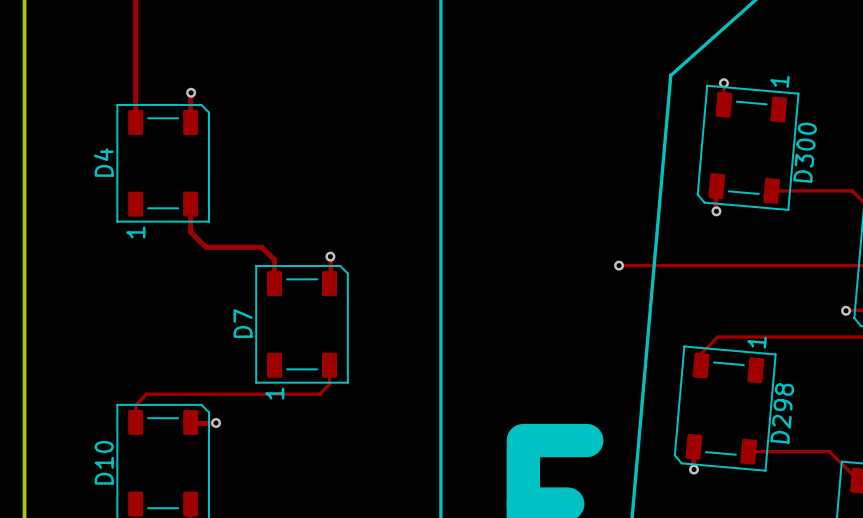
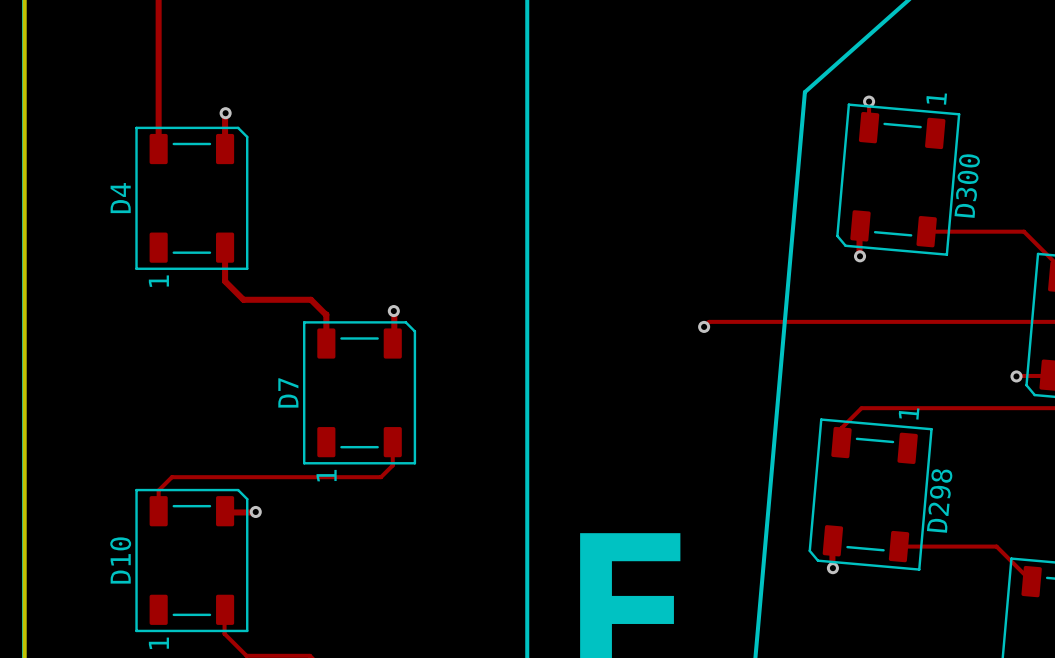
track: none -> (742, 321) (709, 321) (704, 326)
via position: (619, 265) -> (704, 326)

